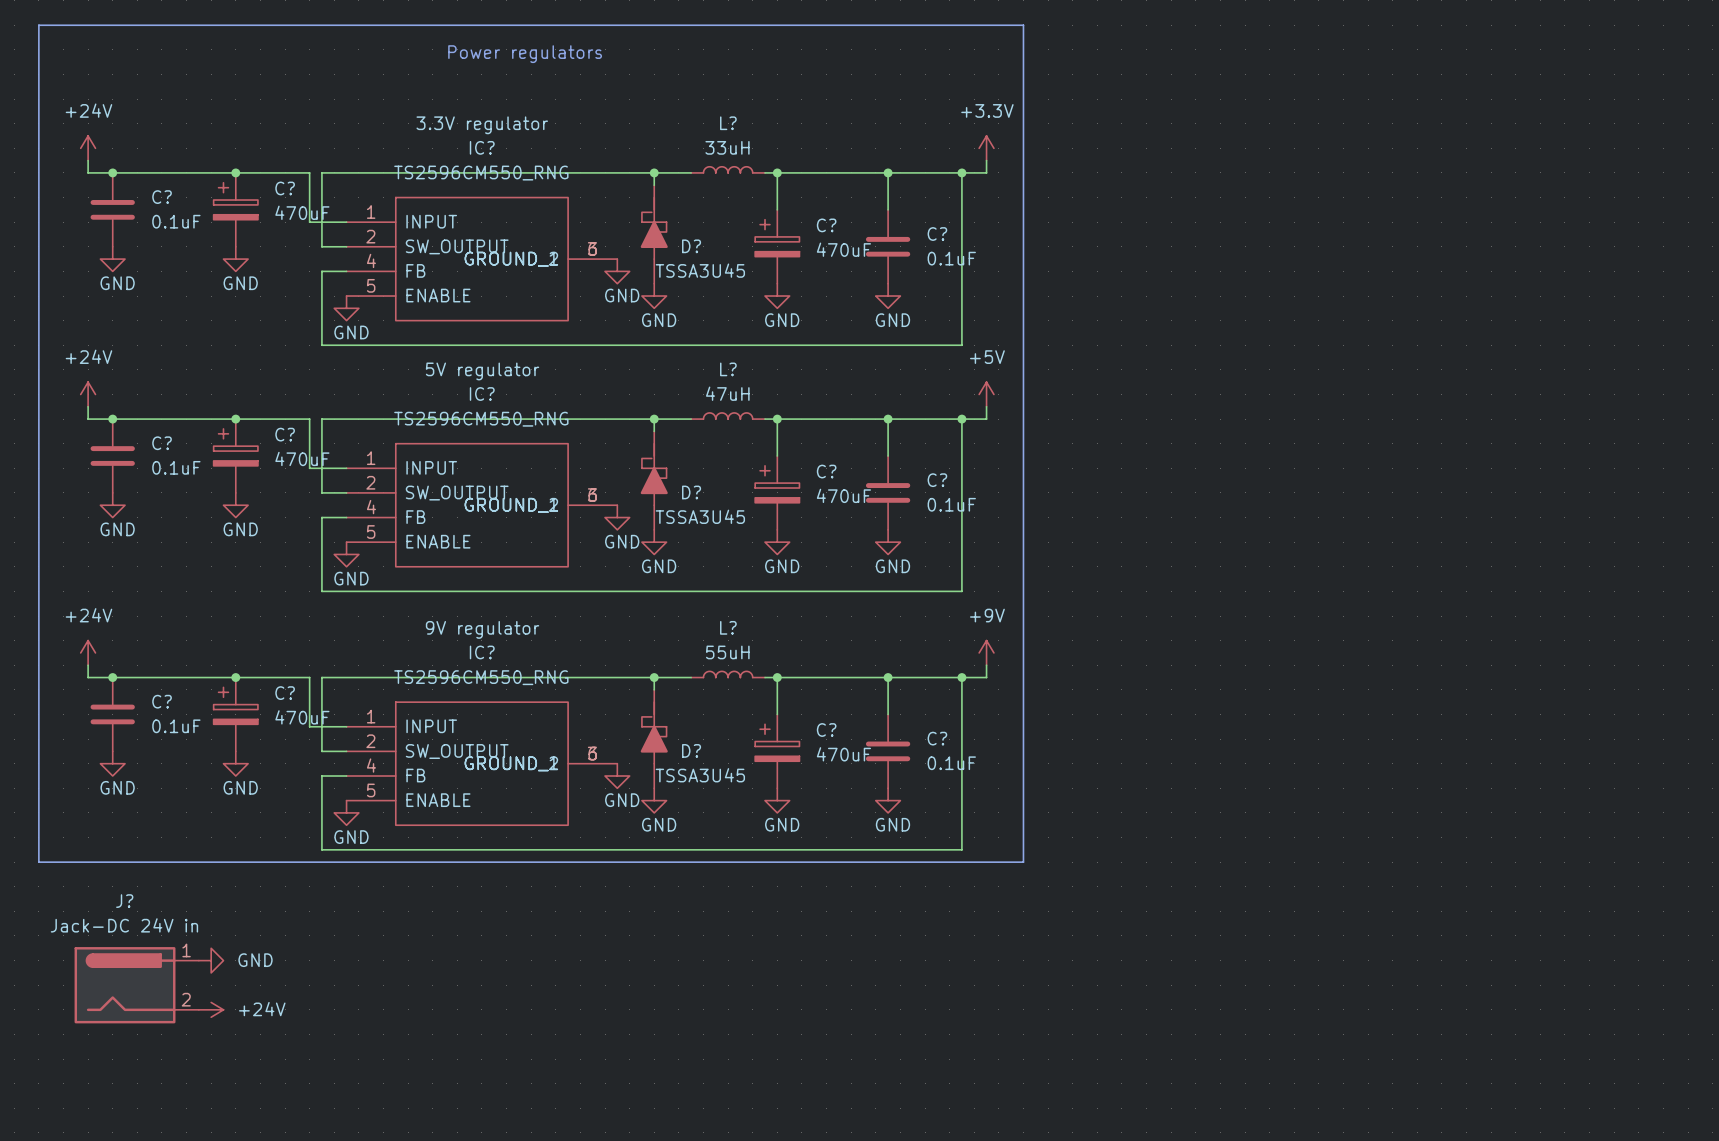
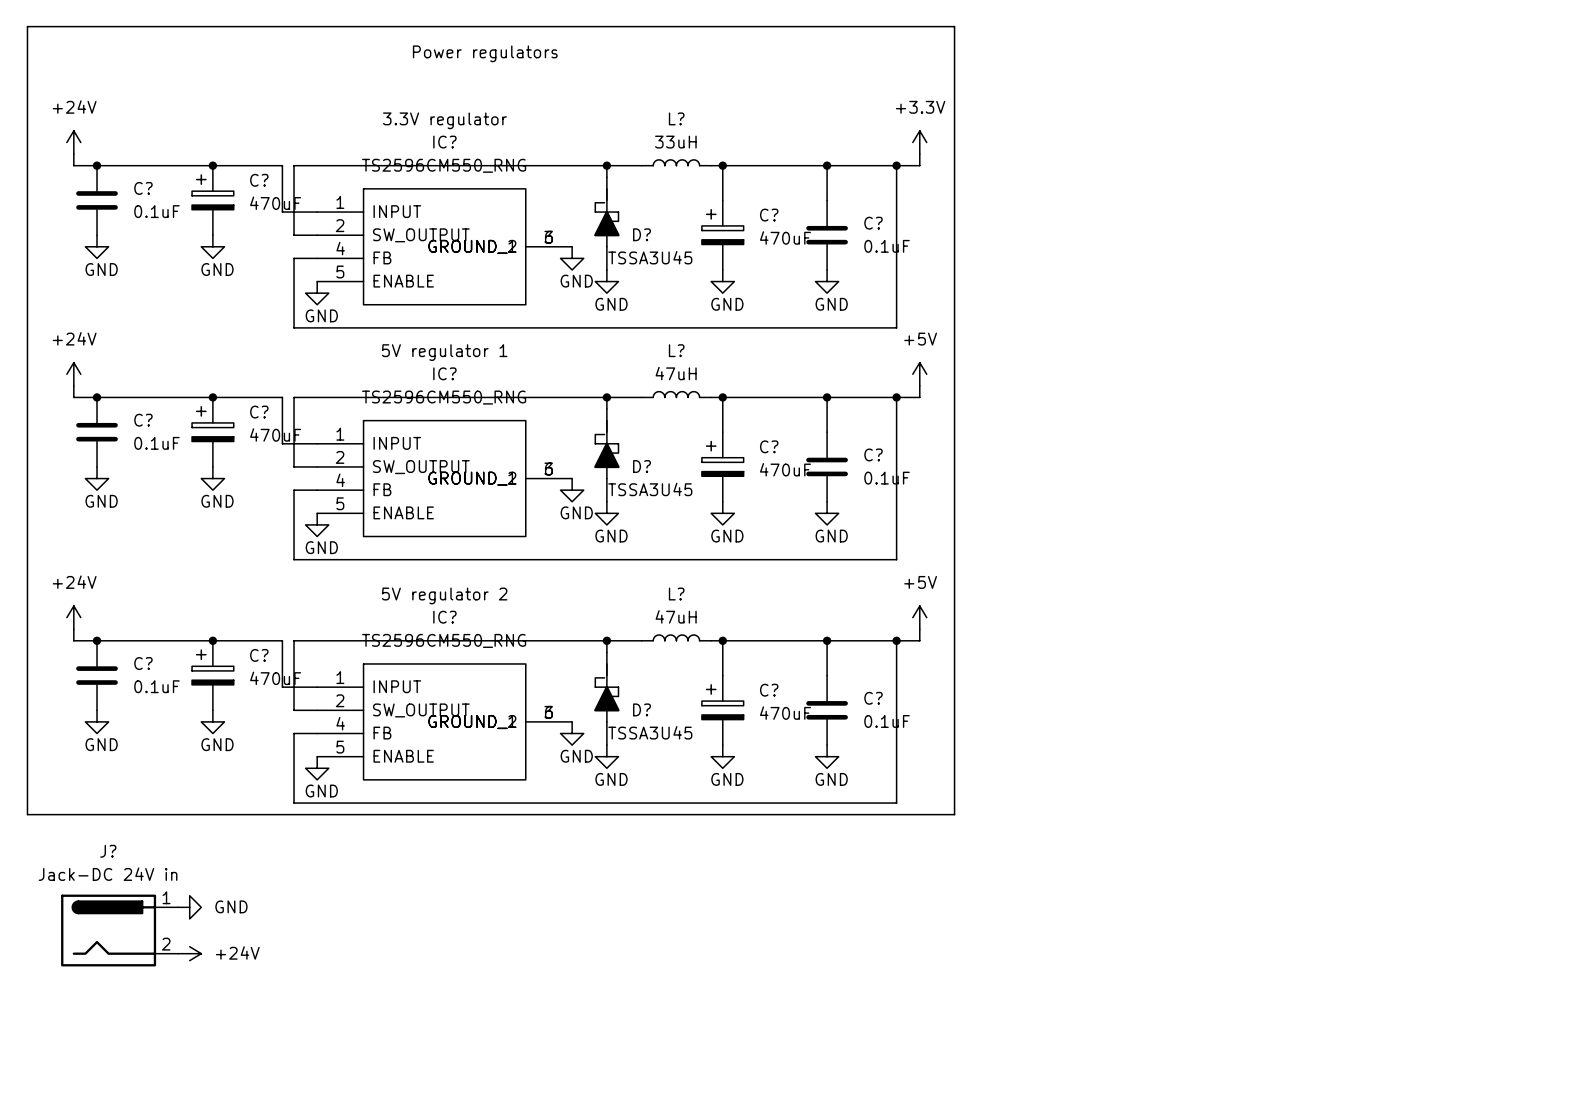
IC? text: 5V regulator (482, 371) -> 5V regulator 1 (444, 352)
IC? text: 9V regulator (482, 629) -> 5V regulator 2 (444, 595)
L? value: 55uH (727, 652) -> 47uH (676, 616)
power symbol: +9V (986, 652) -> +5V (919, 617)

